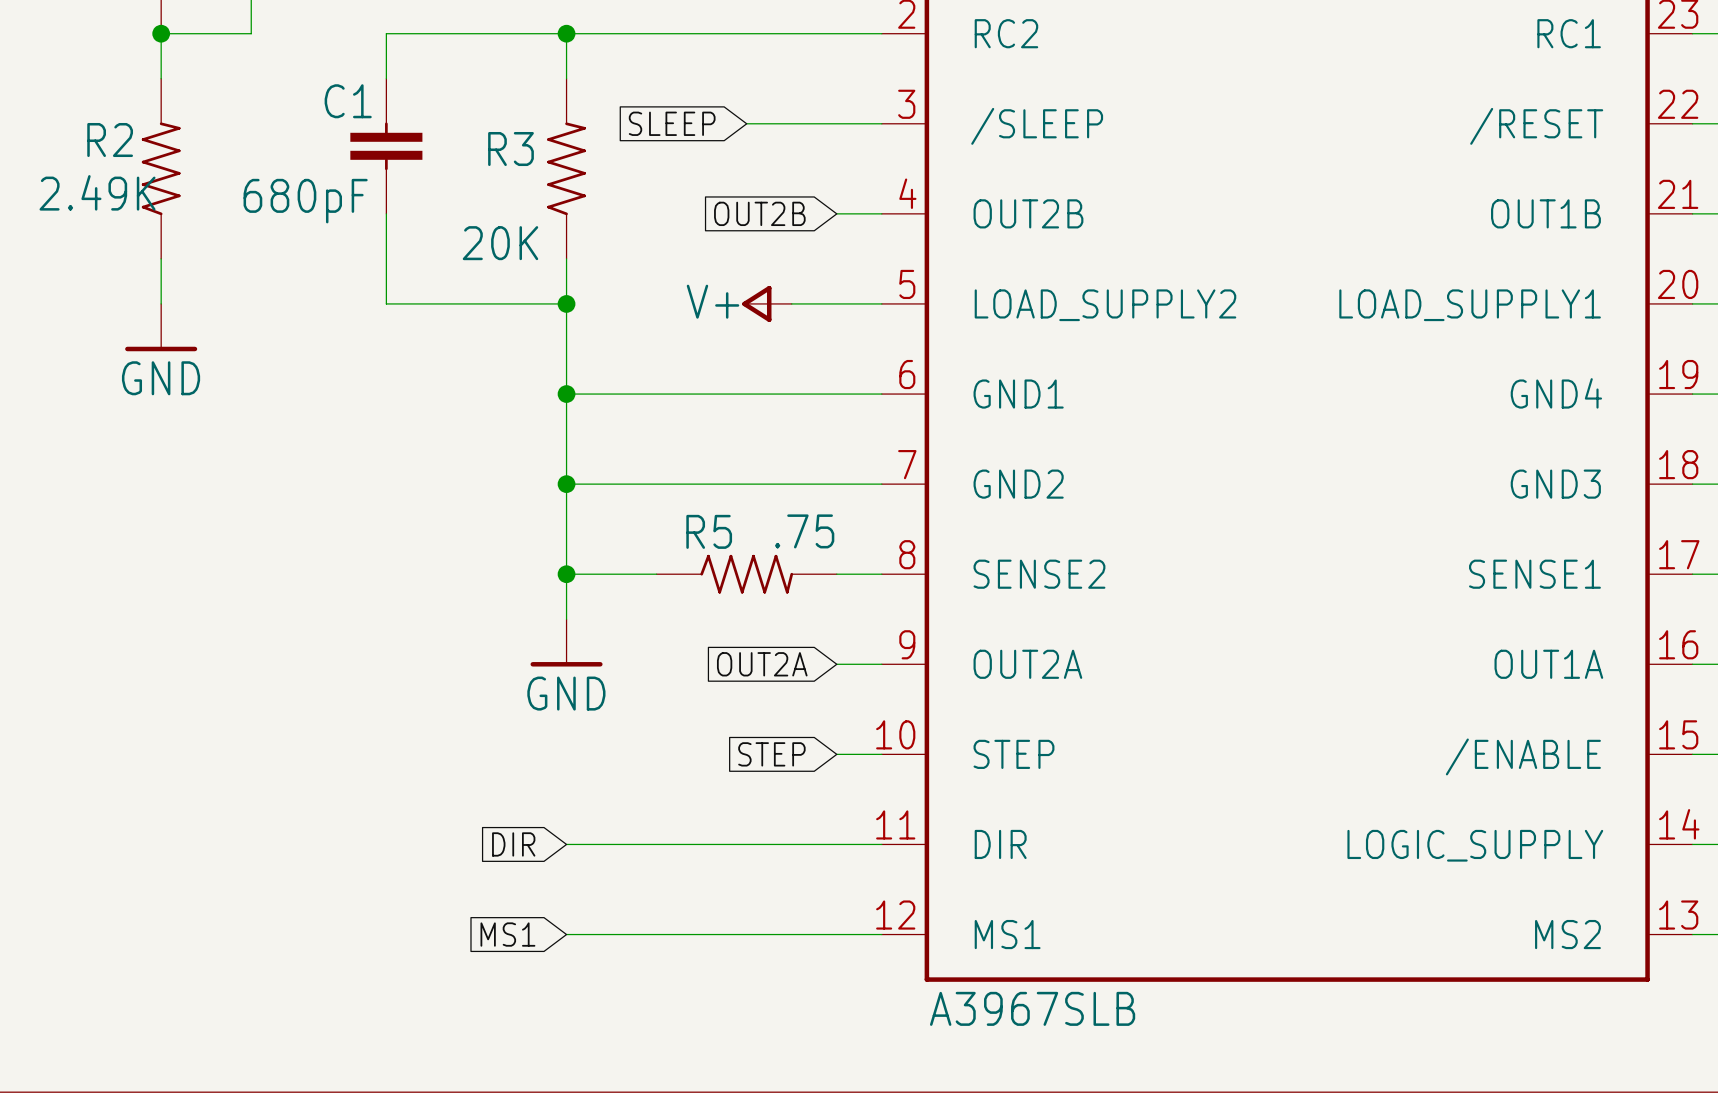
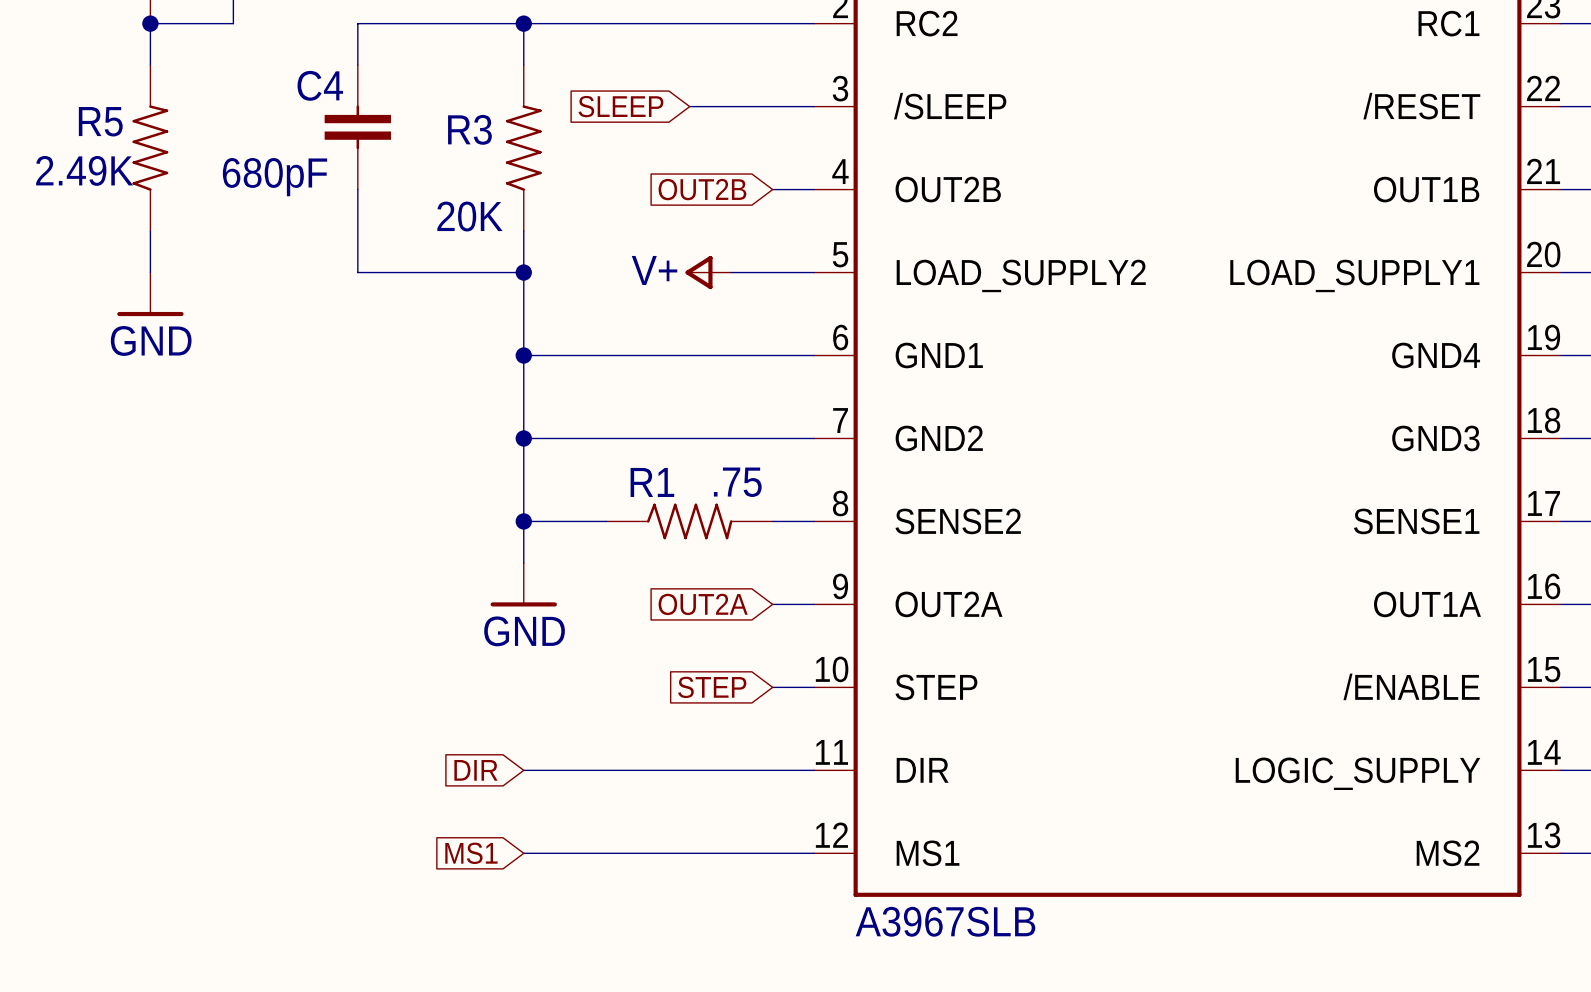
C1 name: C1 (348, 101) -> C4 (320, 85)
R2 name: R2 (110, 140) -> R5 (100, 121)
R5 name: R5 (709, 531) -> R1 (652, 482)

